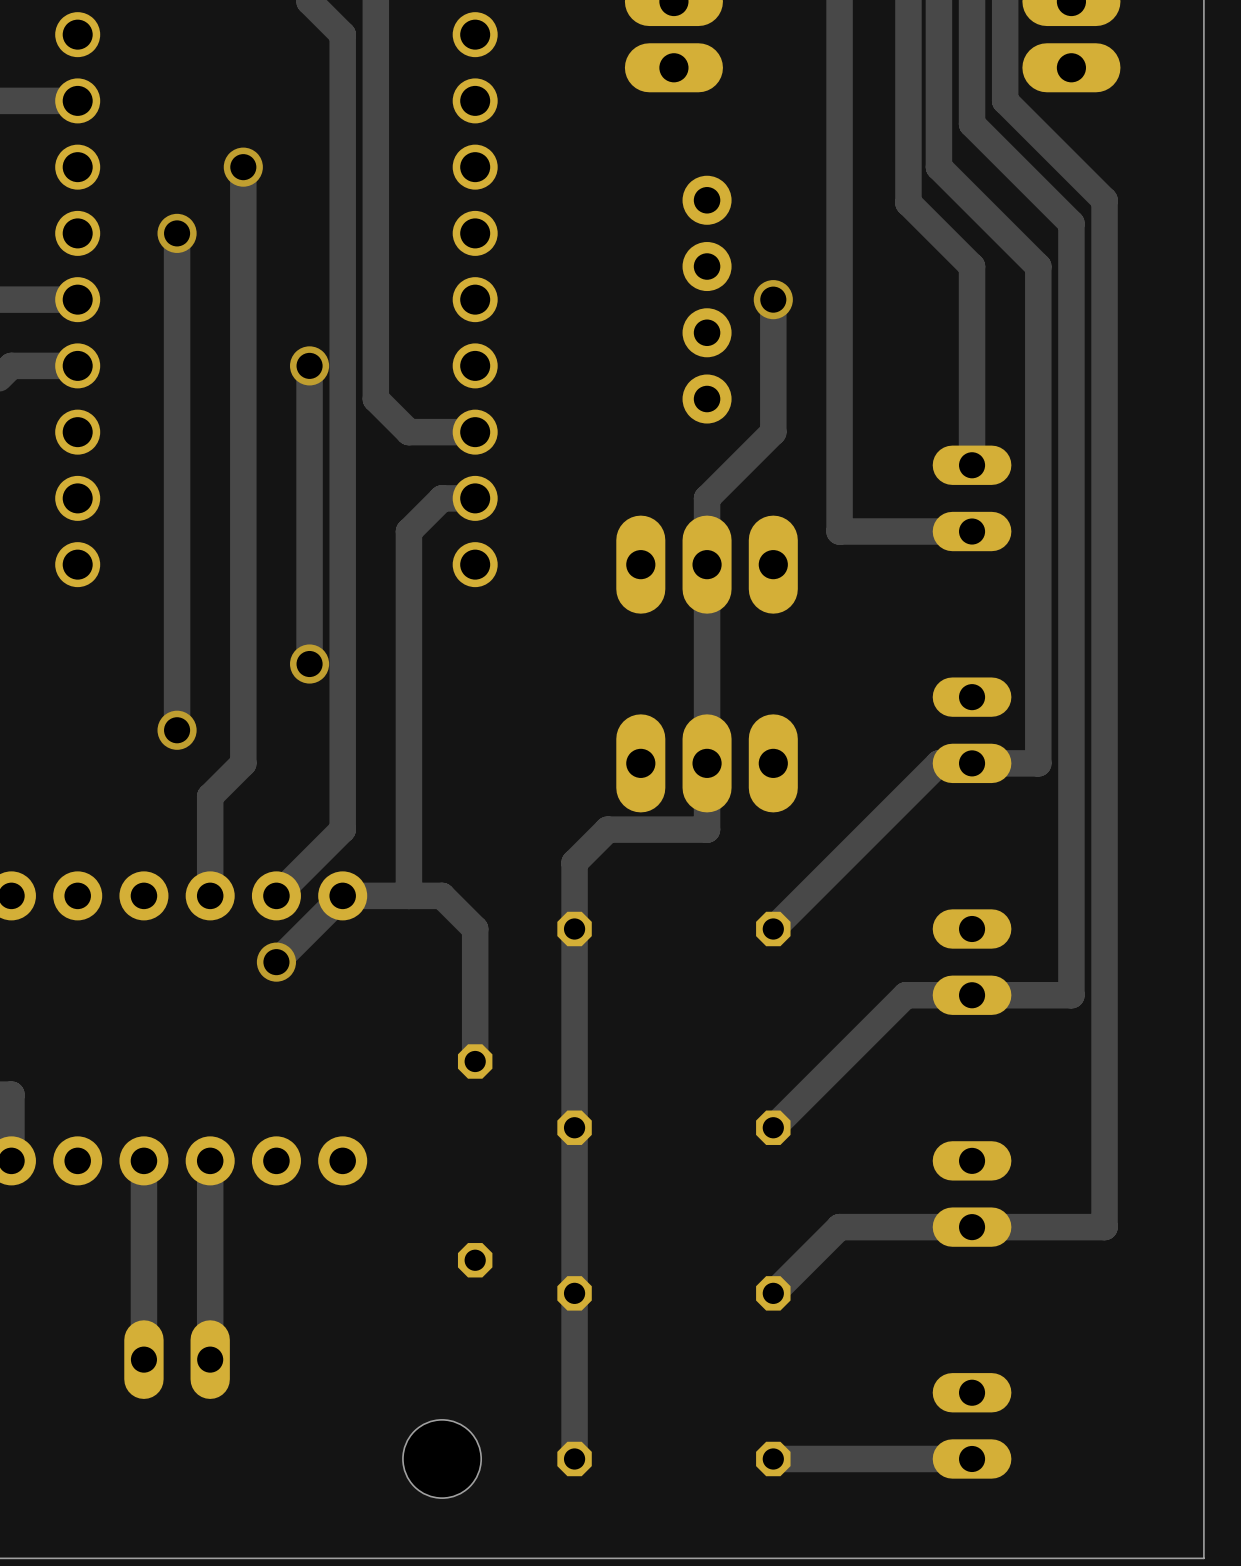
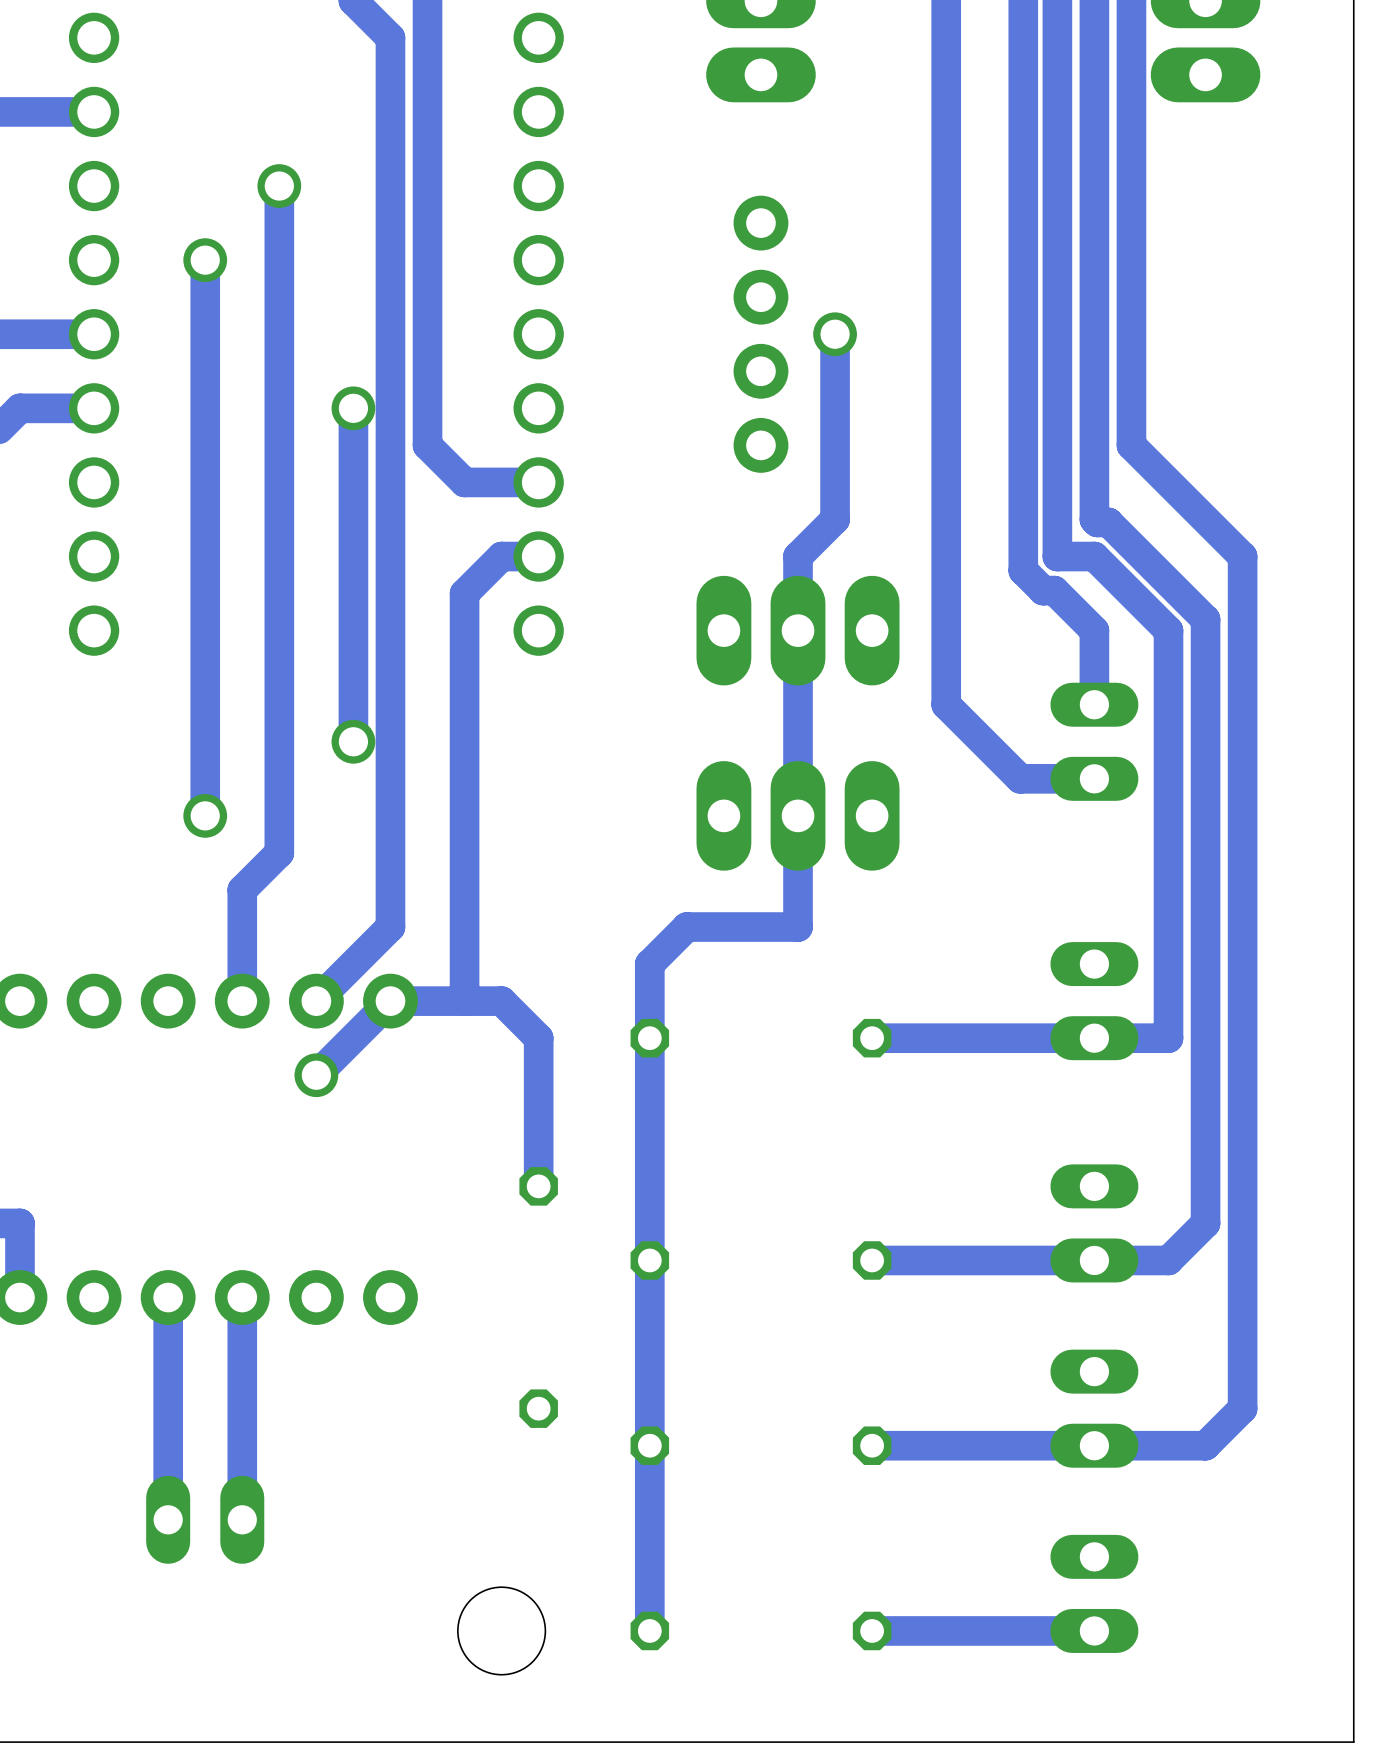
track: (1005, 100) (1104, 200) (1104, 498) -> (1131, 111) (1131, 445) (1242, 556)
track: (972, 124) (1071, 223) (1071, 554) -> (1094, 519) (1097, 522) (1108, 522) (1205, 619)
track: (938, 167) (1038, 266) (1038, 564) -> (1057, 186) (1057, 556) (1094, 556) (1168, 630)
track: (908, 202) (972, 266) -> (1094, 137) (1094, 297)
track: none -> (1023, 226) (1023, 570) (1043, 590) (1054, 590) (1094, 630) (1094, 704)
part position: (707, 299) -> (760, 334)
track: (773, 299) (773, 432) (740, 465) -> (835, 334) (835, 519)
via position: (773, 299) -> (835, 334)
part: (972, 498) -> none
track: (972, 531) (839, 531) -> (1094, 778) (1020, 778) (946, 704) (946, 593)
part position: (972, 730) -> (1094, 741)
part position: (707, 763) -> (798, 815)
track: (1038, 763) (938, 763) (773, 929) -> (1168, 852) (1168, 1038) (872, 1038)
part: none -> (1094, 1001)
part: (972, 962) -> none
track: (1071, 995) (905, 995) (773, 1127) -> (1205, 1112) (1205, 1223) (1168, 1260) (872, 1260)
part: none -> (1094, 1223)
part: (972, 1194) -> none
track: (1104, 1227) (839, 1227) (773, 1293) -> (1242, 1371) (1242, 1408) (1205, 1445) (872, 1445)
part: none -> (1094, 1408)

